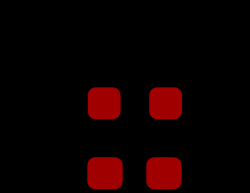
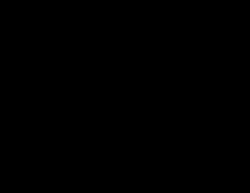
part: (134, 103) -> none
part: (134, 173) -> none

